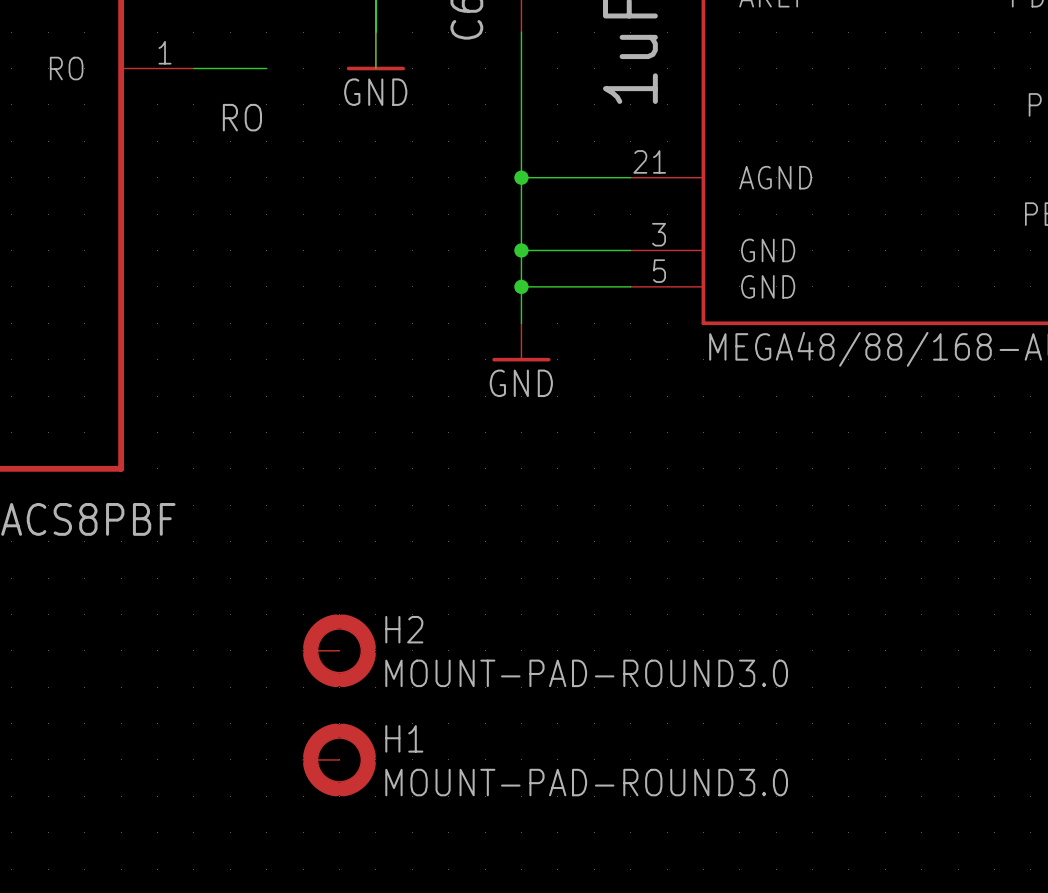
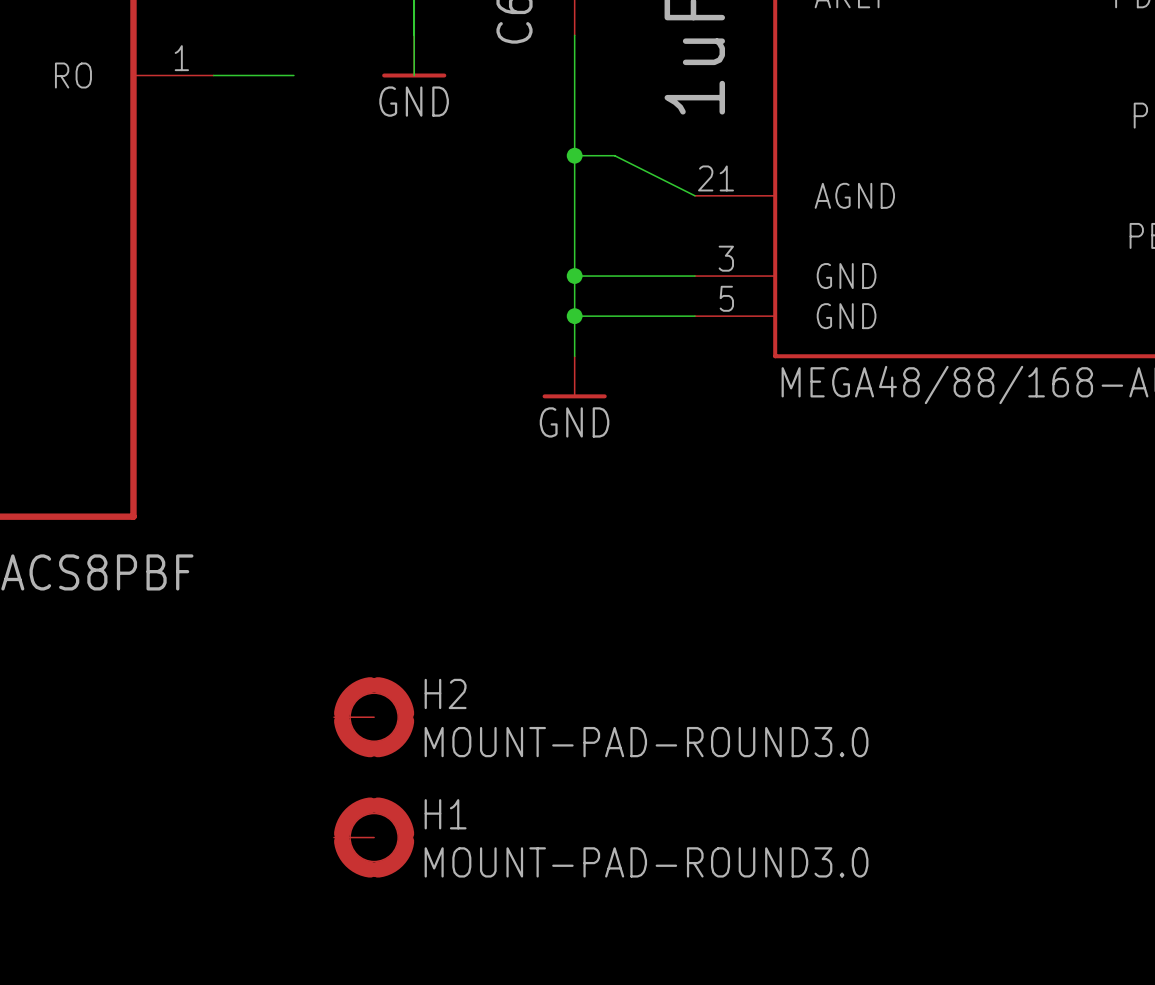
label: RO (242, 117) -> none
wire: (521, 177) (630, 177) -> (574, 155) (614, 155) (694, 195)
junction position: (521, 177) -> (574, 155)

